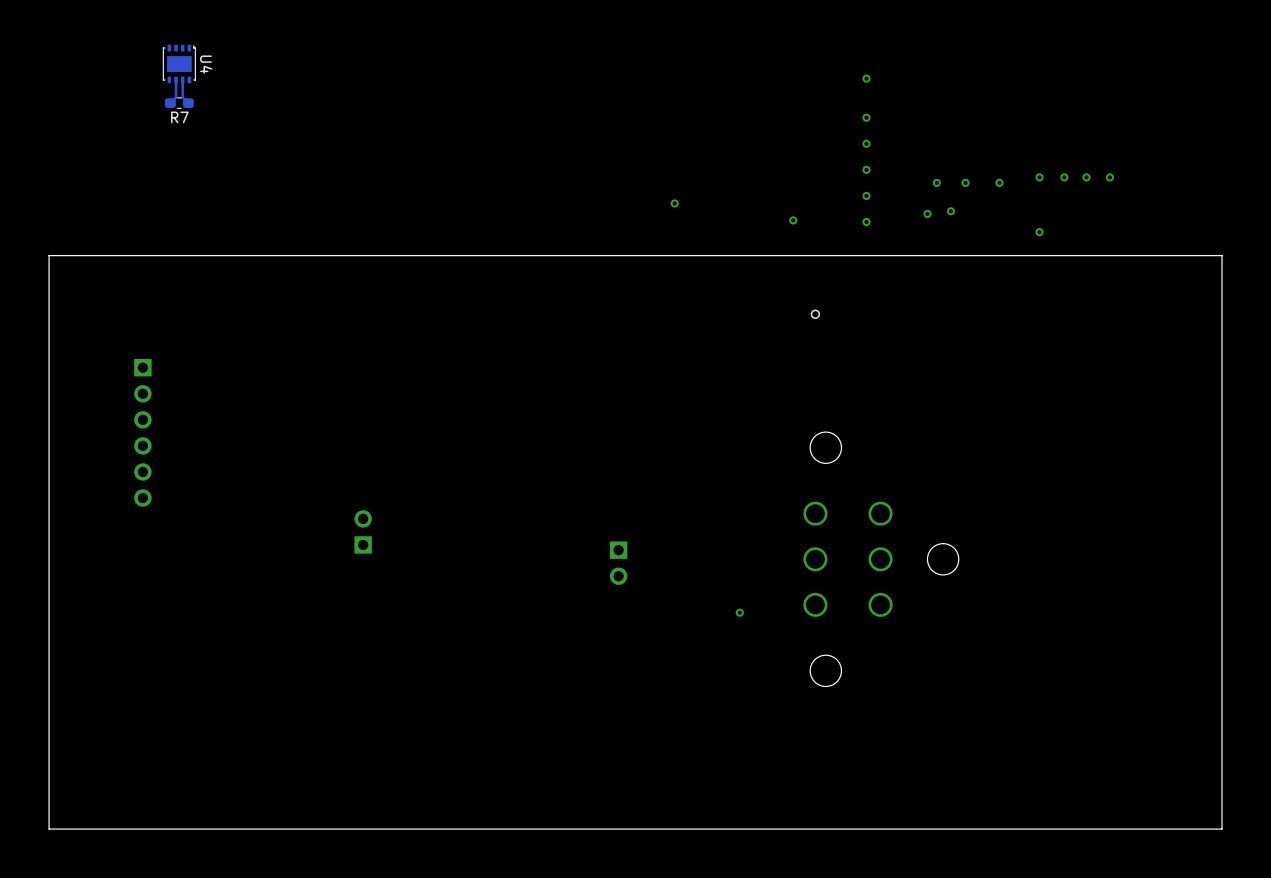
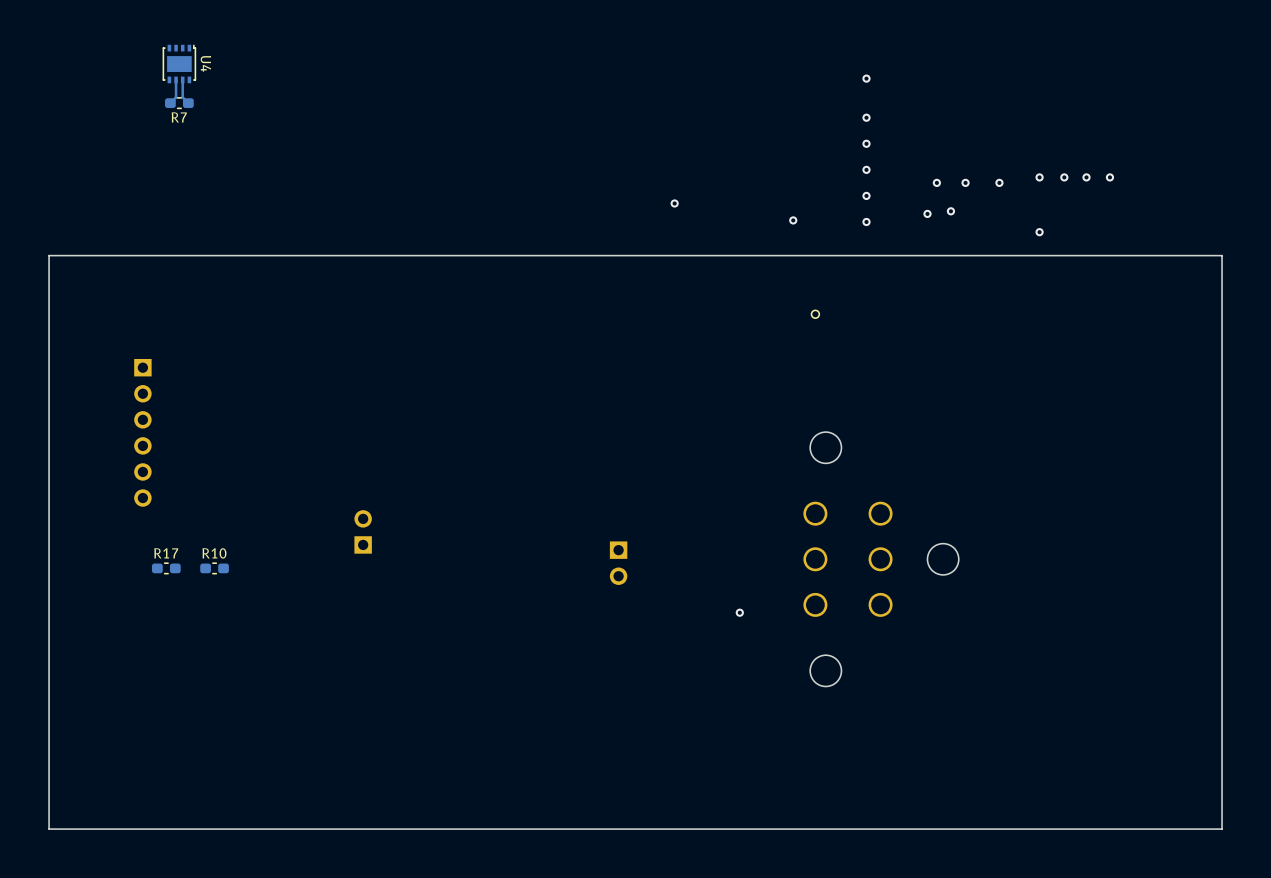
R17: none -> (166, 568)
R10: none -> (214, 568)

